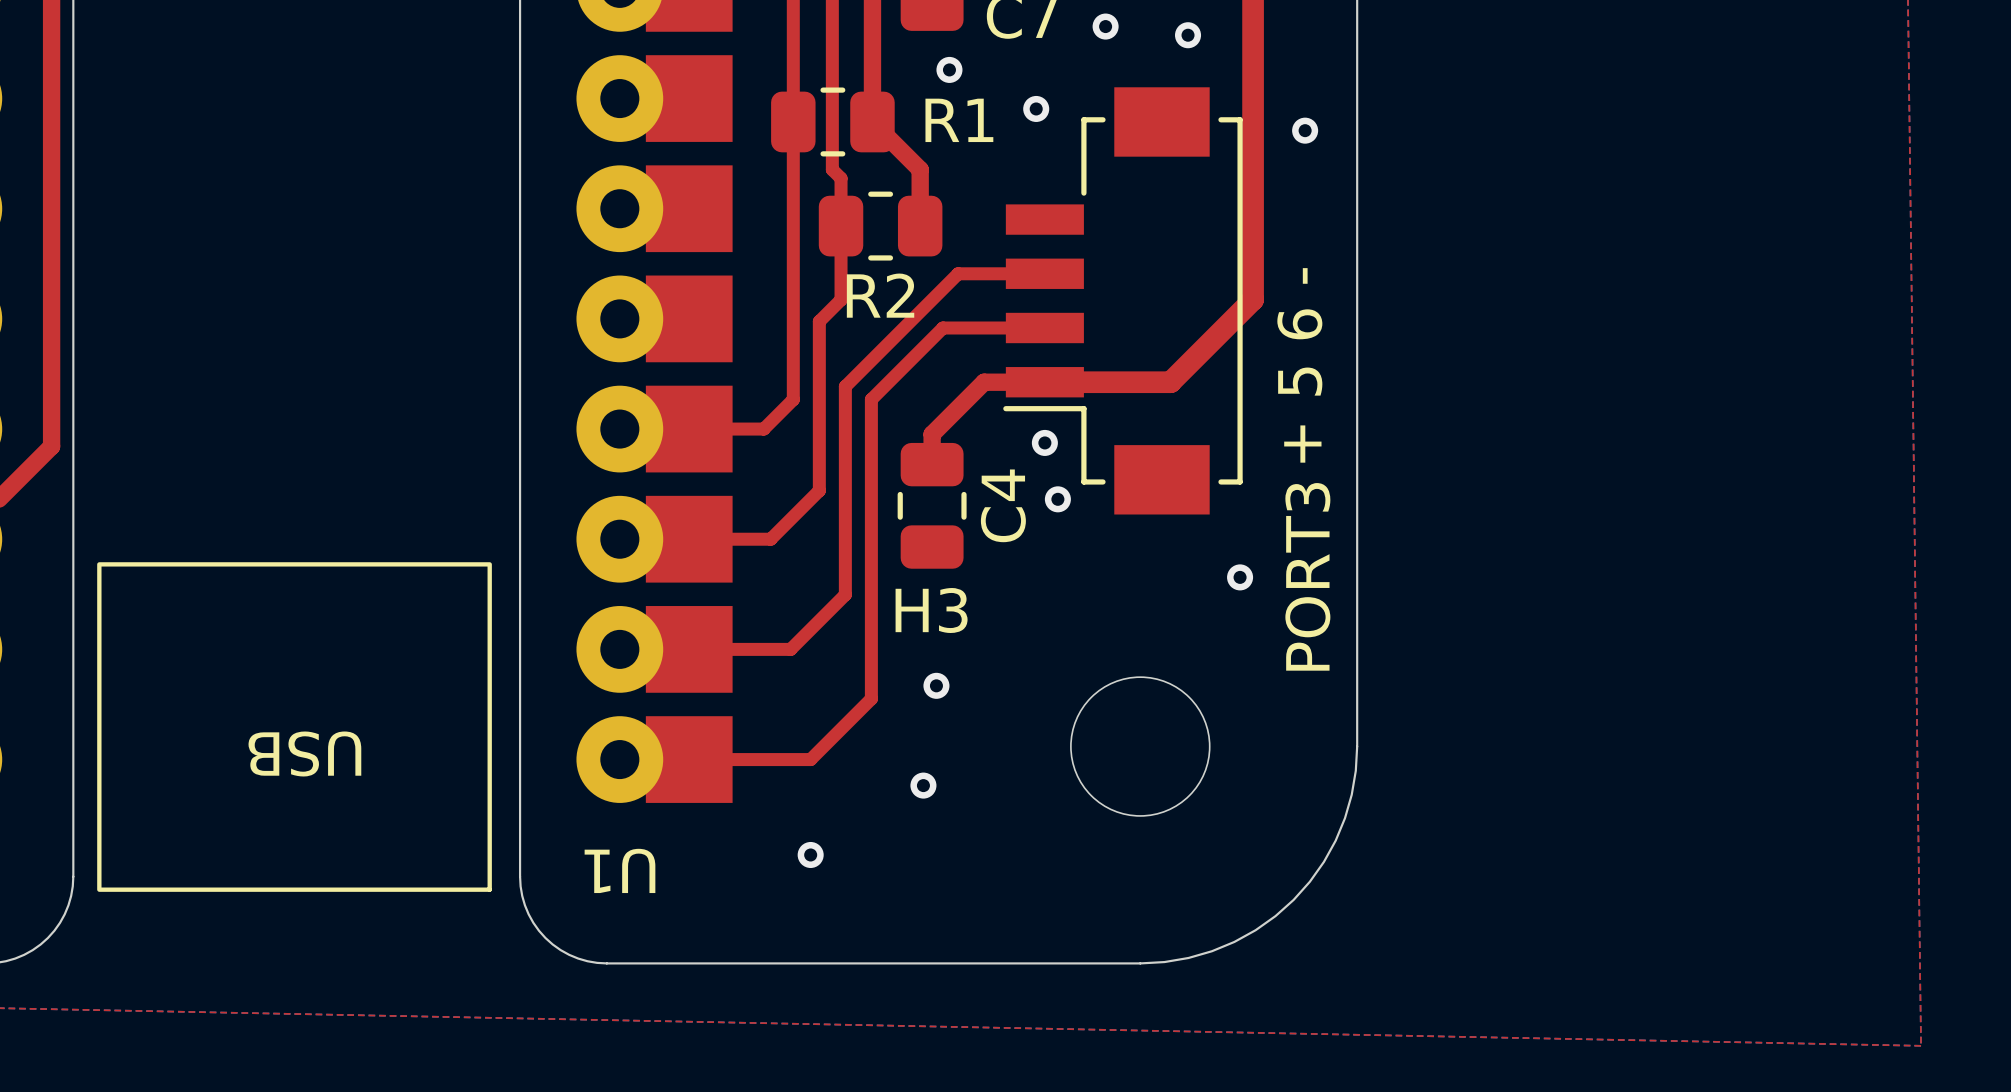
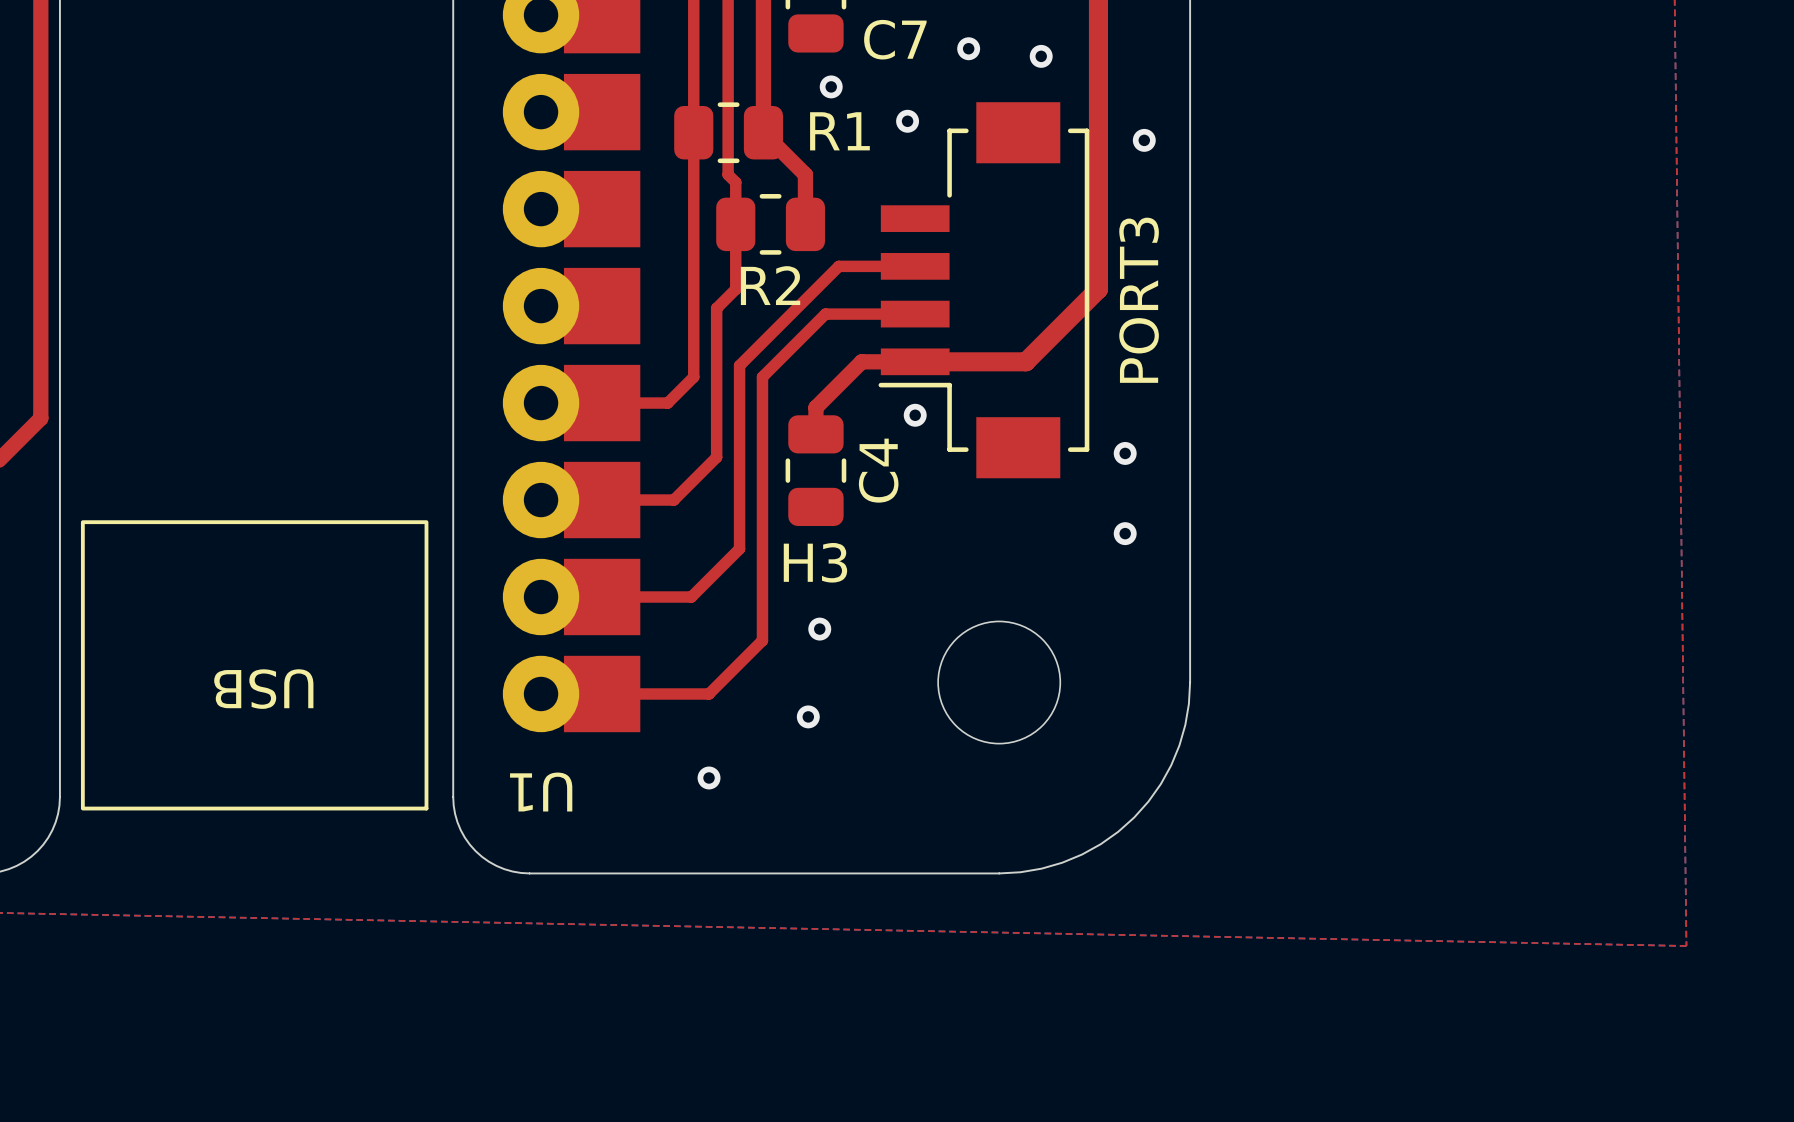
text: + 5 6 - (1299, 365) -> none
via: none -> (1125, 453)
via: (1057, 499) -> none
PORT3 name position: PORT3 (1307, 576) -> PORT3 (1139, 300)
via position: (1240, 577) -> (1125, 533)

